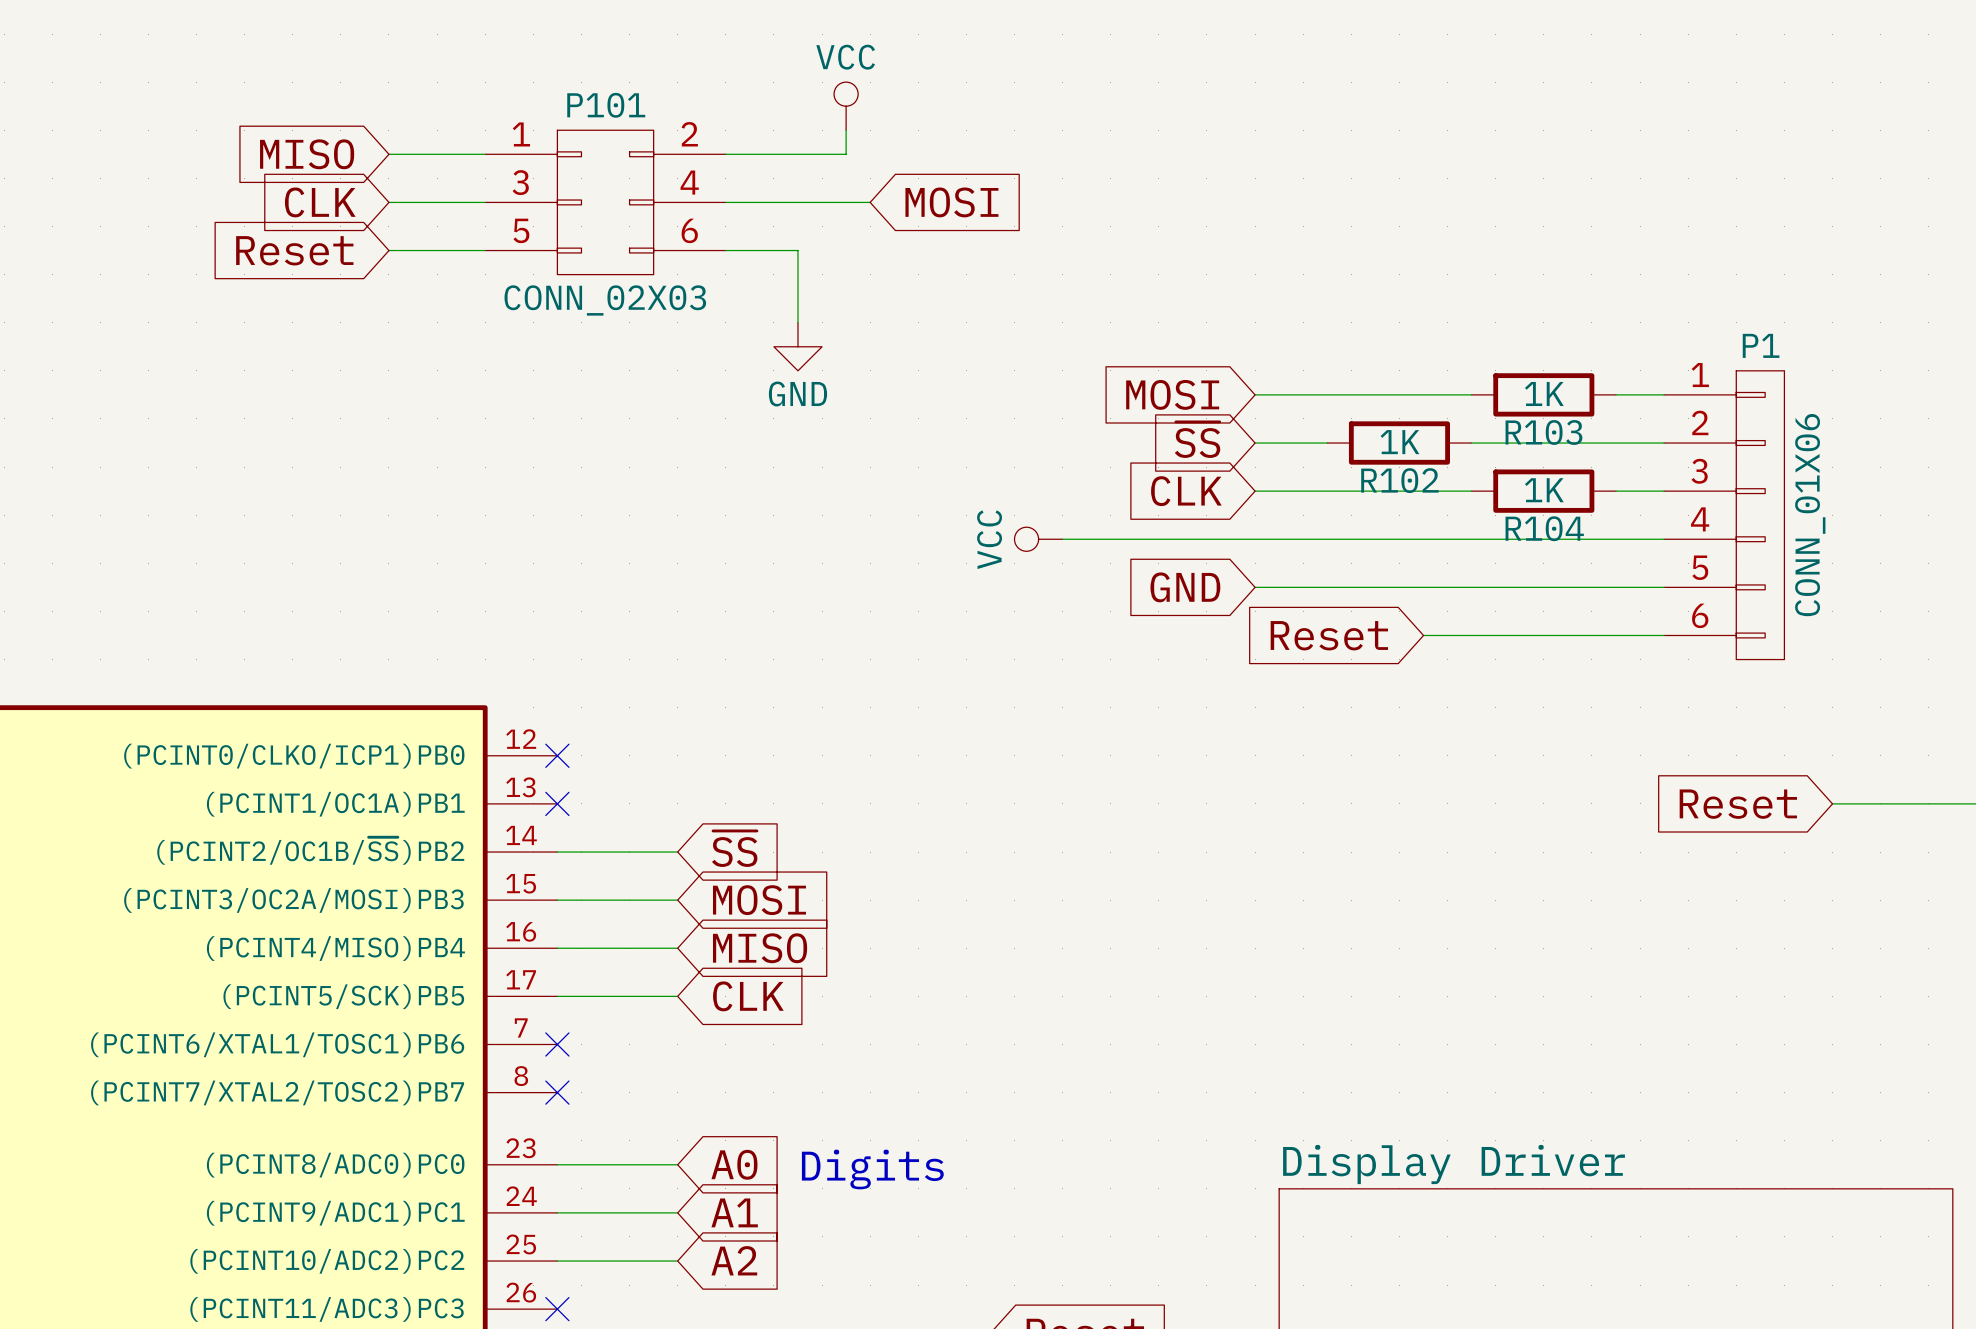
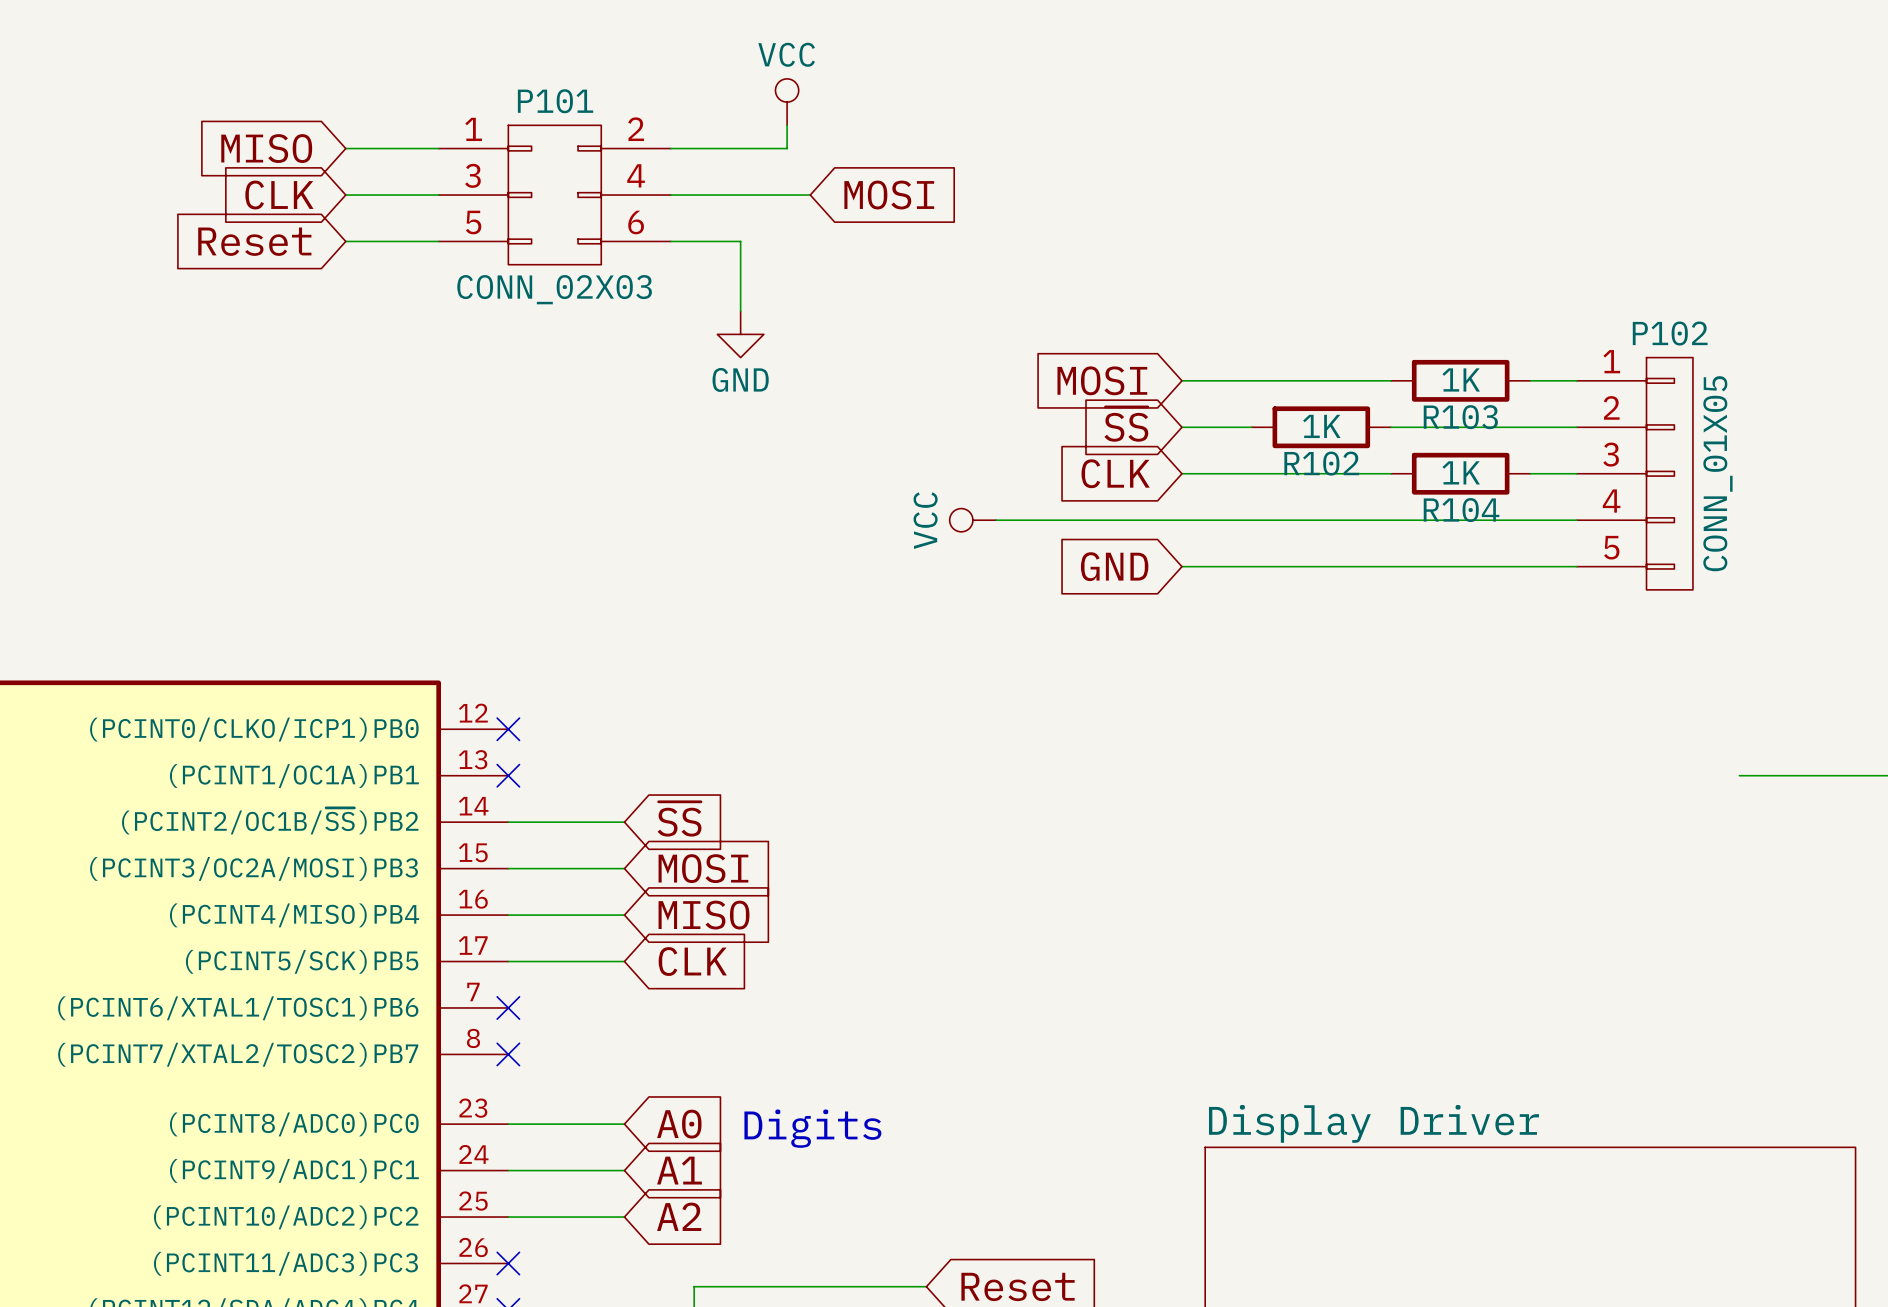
P102: none -> CONN_01X05 (1634, 473)
P1: CONN_01X06 (1724, 515) -> none
global label: Reset (1329, 635) -> none
wire: (1423, 635) (1664, 635) -> none
global label: Reset (1738, 804) -> none

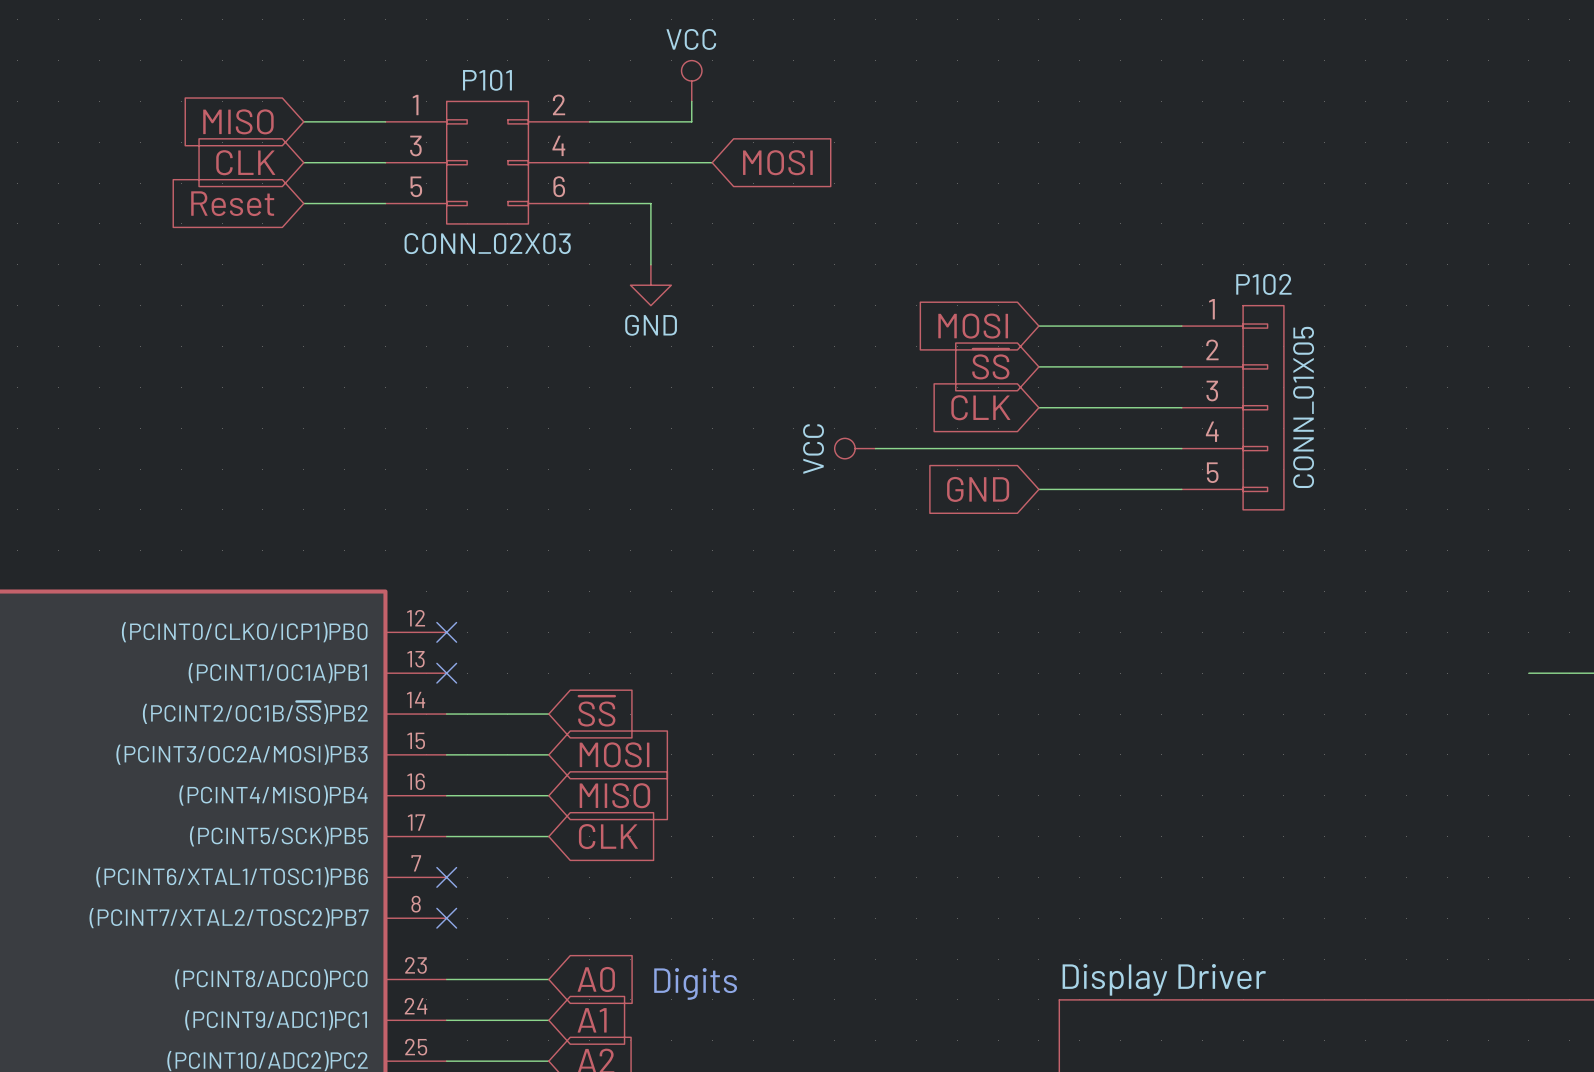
R103: 1K (1460, 380) -> none
wire: (1530, 380) (1576, 380) -> none
wire: none -> (1100, 366) (1181, 366)
R102: 1K (1321, 427) -> none
wire: (1391, 427) (1576, 427) -> none
R104: 1K (1460, 473) -> none
wire: (1530, 473) (1576, 473) -> none
P102 position: (1634, 473) -> (1232, 407)
wire: (1344, 520) (1576, 520) -> none
wire: (1344, 566) (1576, 566) -> none

